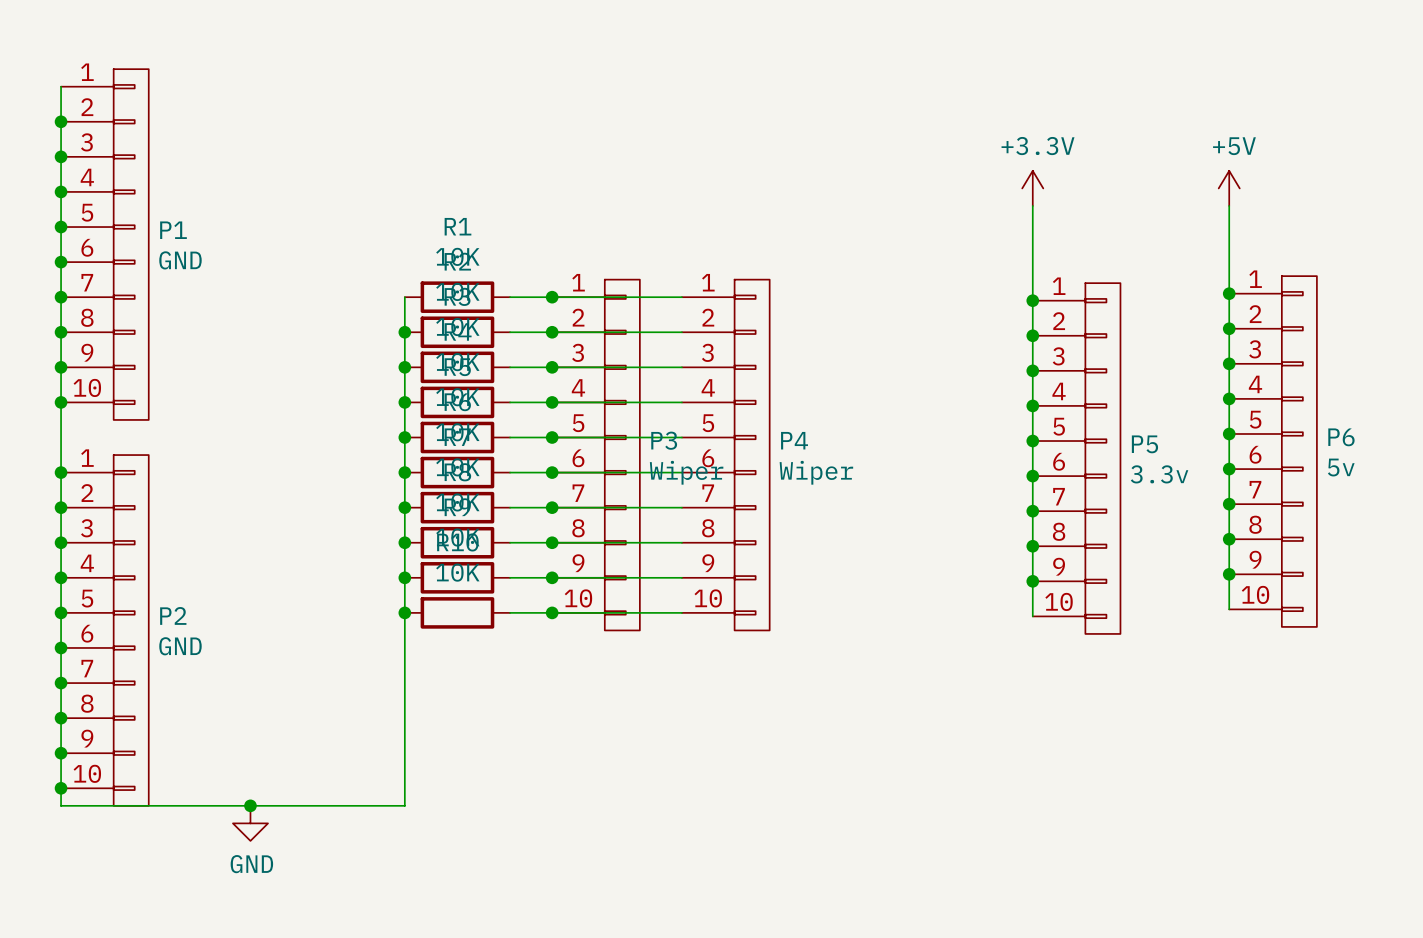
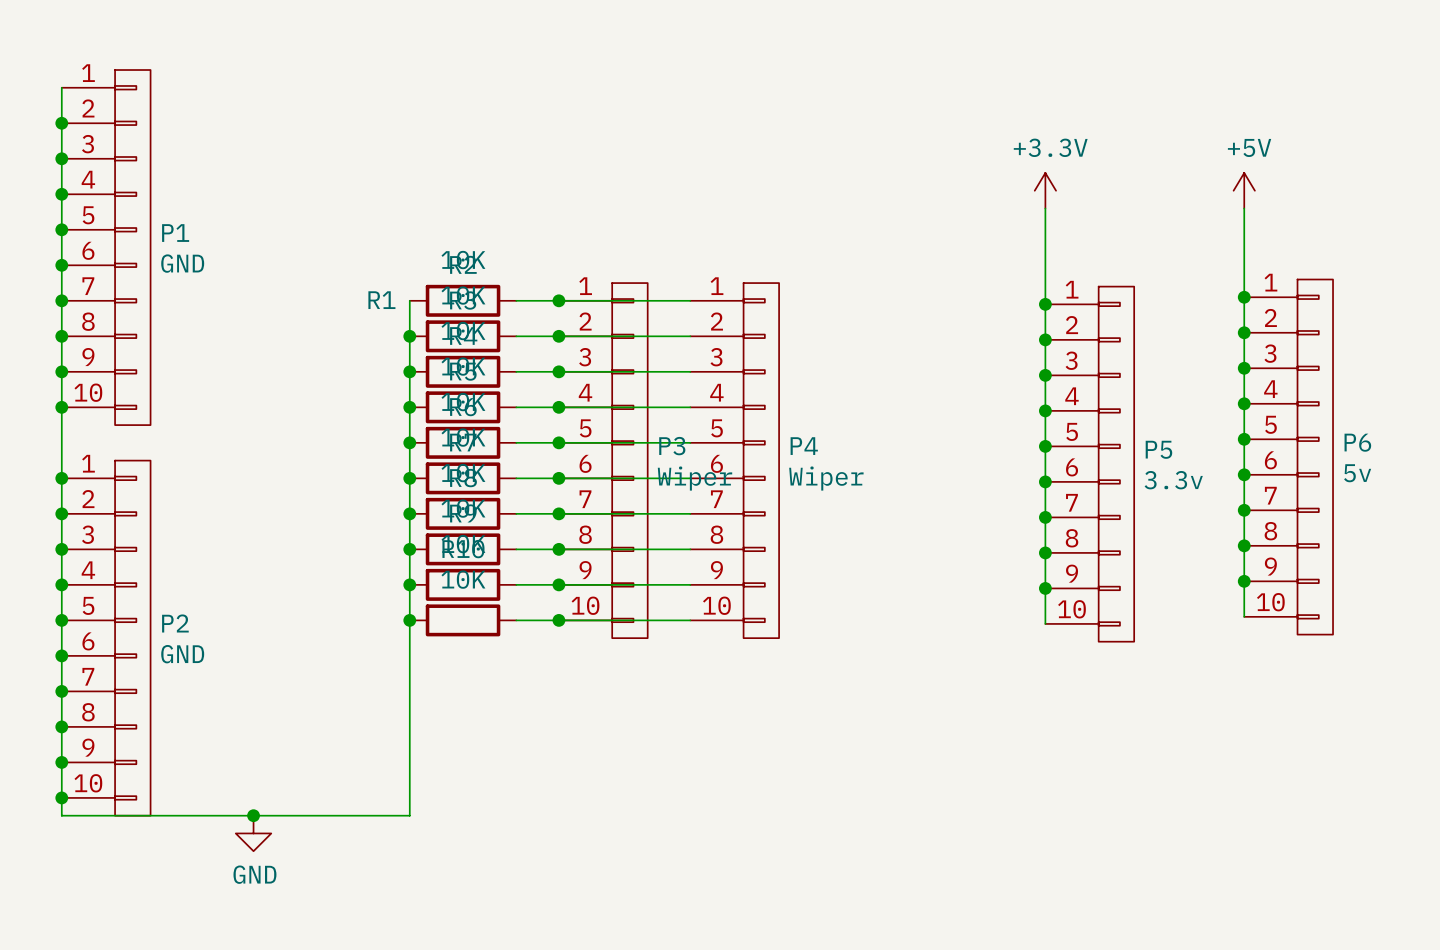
R1 name position: R1 (457, 226) -> R1 (381, 300)

